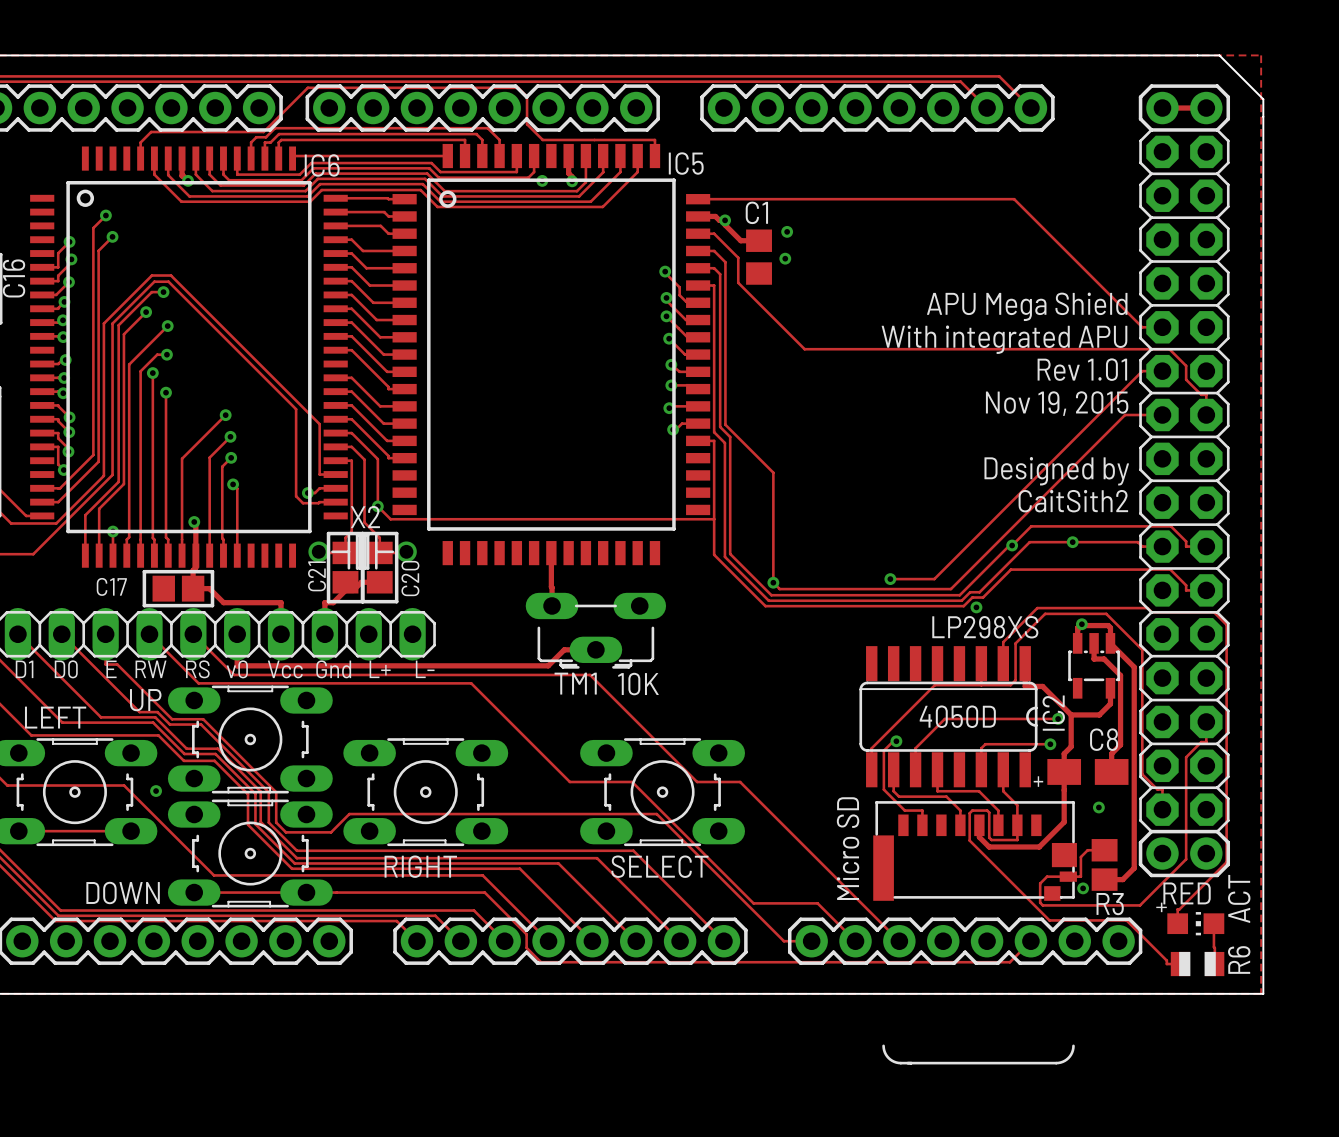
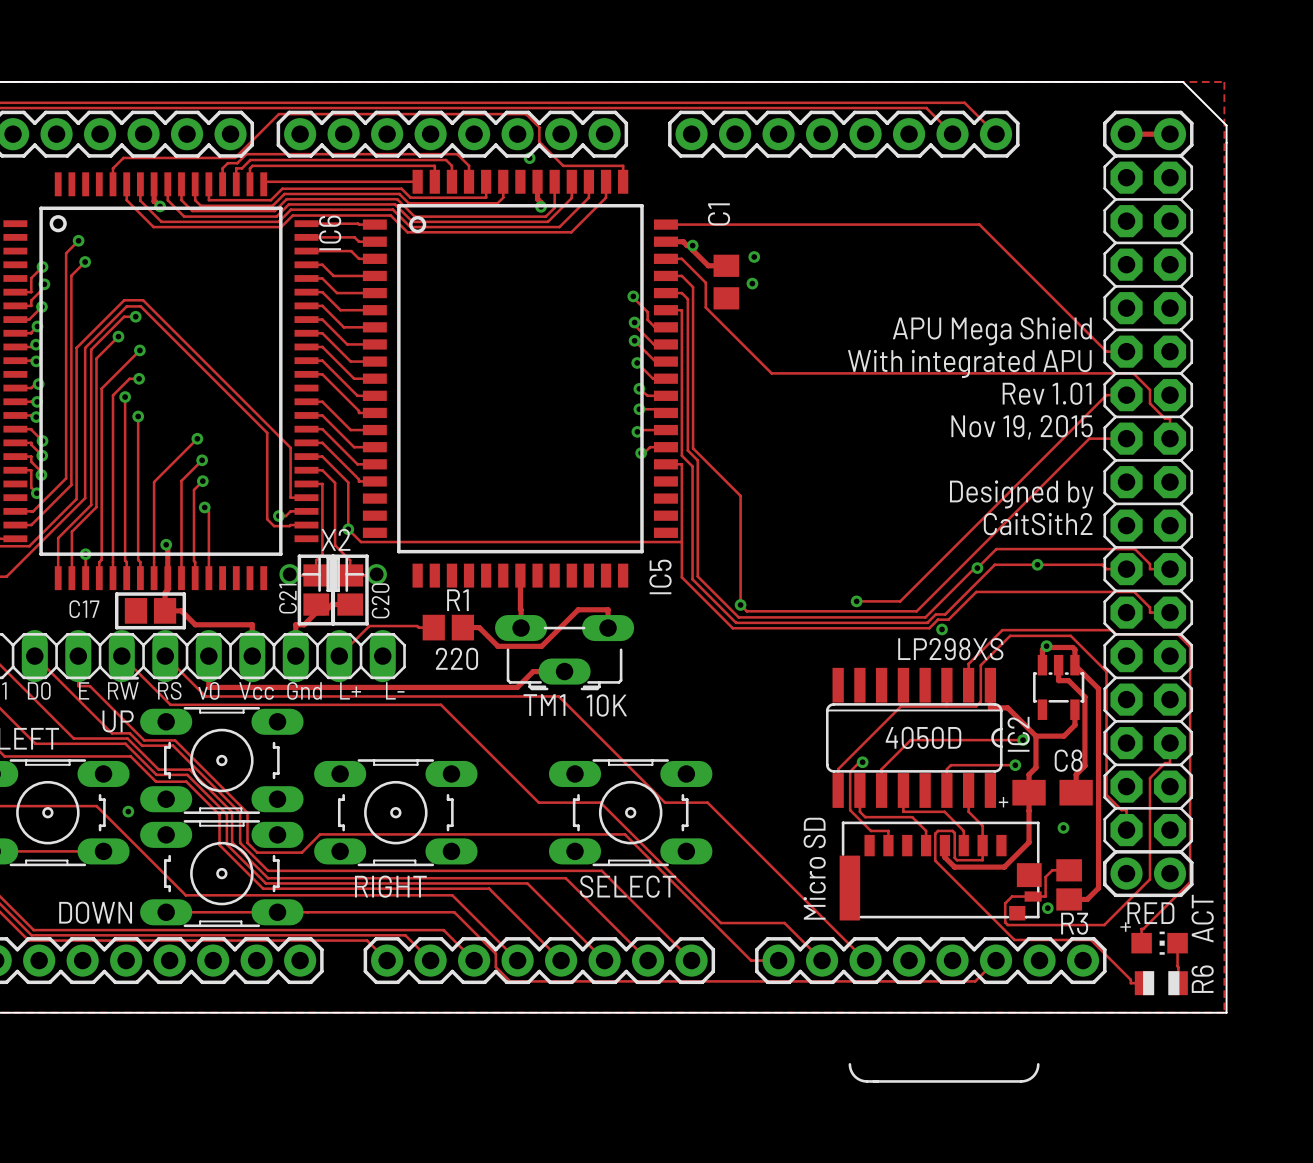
track: (518, 87) (527, 96) (527, 124) (542, 139) (594, 139) -> (487, 114) (526, 114) (539, 127) (539, 141) (563, 165)
IC5 name rotation: 0° (686, 163) -> 90° counterclockwise (660, 576)
IC5 name position: IC5 (686, 163) -> IC5 (660, 576)
IC6 name rotation: 0° (322, 165) -> 90° counterclockwise (330, 232)
via position: (542, 180) -> (529, 158)
C1 name rotation: 0° (756, 212) -> 90° counterclockwise (719, 214)
track: none -> (433, 627) (369, 626) (339, 656)
R1: none -> 220 (448, 627)
track: none -> (462, 627) (479, 627) (497, 646) (541, 646) (578, 609) (608, 609) (608, 628)

